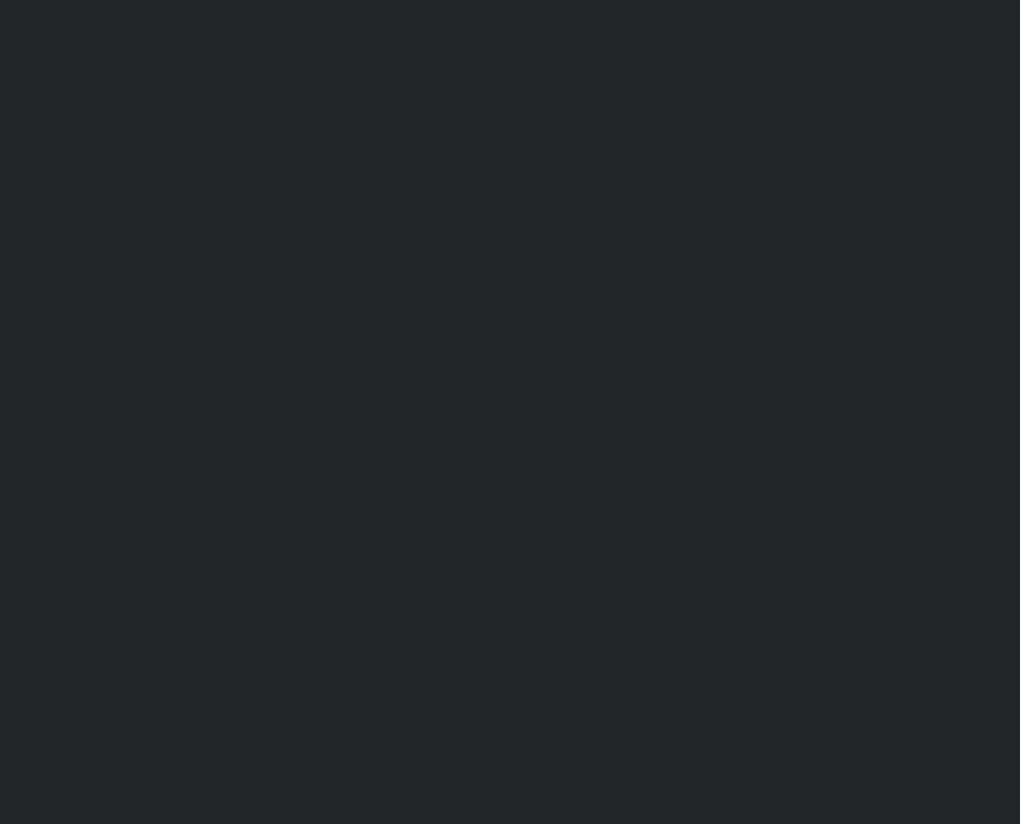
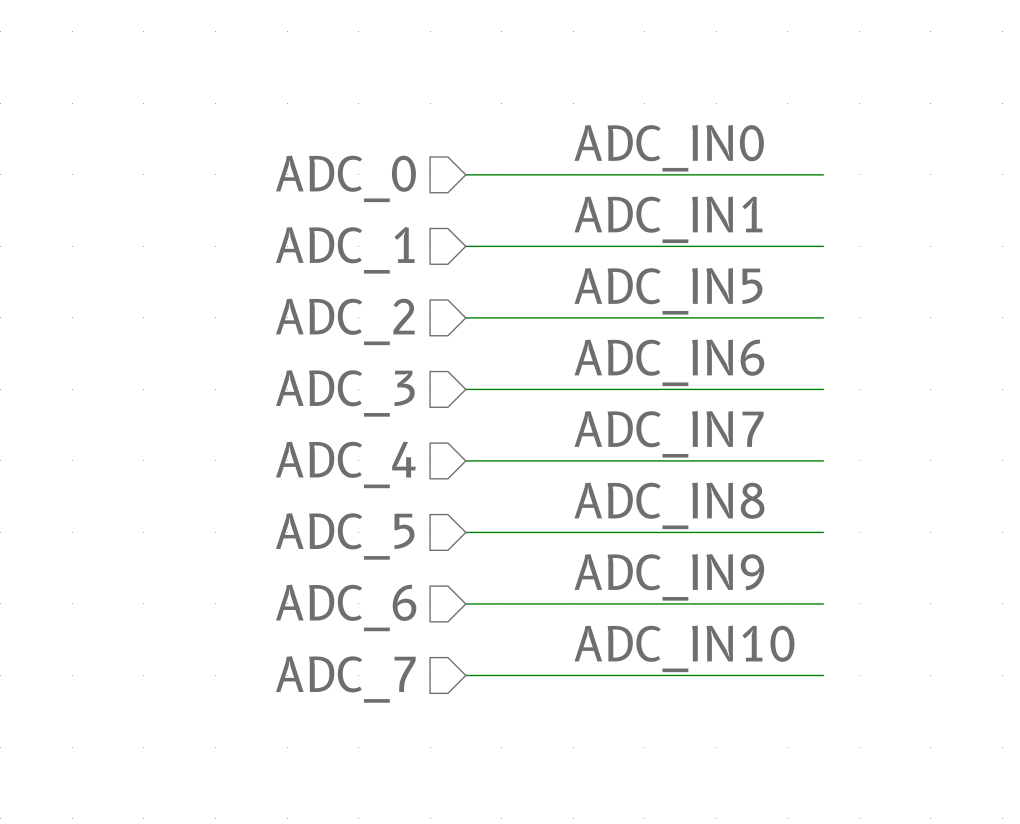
label: none -> ADC_IN0 (669, 148)
wire: none -> (465, 174) (823, 174)
sheet pin: none -> ADC_0 (345, 178)
label: none -> ADC_IN1 (668, 219)
wire: none -> (465, 246) (823, 246)
sheet pin: none -> ADC_1 (345, 250)
label: none -> ADC_IN5 (668, 291)
wire: none -> (465, 317) (823, 317)
sheet pin: none -> ADC_2 (345, 321)
label: none -> ADC_IN6 (669, 362)
wire: none -> (465, 389) (823, 389)
sheet pin: none -> ADC_3 (345, 393)
label: none -> ADC_IN7 (669, 434)
wire: none -> (465, 460) (823, 460)
sheet pin: none -> ADC_4 (345, 464)
label: none -> ADC_IN8 (669, 505)
wire: none -> (465, 532) (823, 532)
sheet pin: none -> ADC_5 (345, 536)
label: none -> ADC_IN9 (669, 577)
wire: none -> (465, 603) (823, 603)
sheet pin: none -> ADC_6 (346, 607)
label: none -> ADC_IN10 (684, 648)
wire: none -> (465, 675) (823, 675)
sheet pin: none -> ADC_7 (345, 679)

